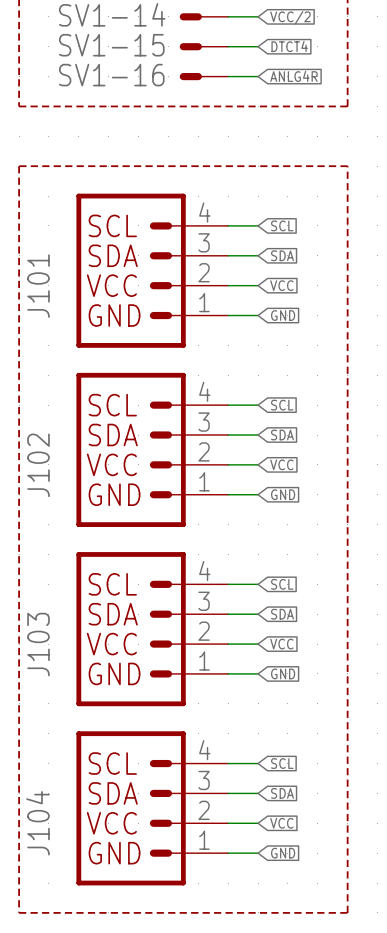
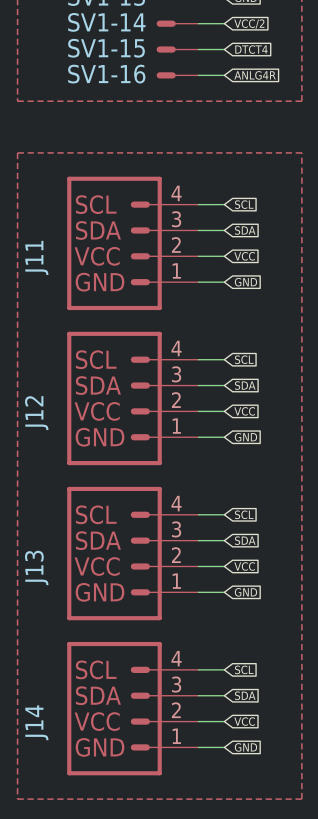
J101 name: J101 (38, 286) -> J11 (36, 257)
J102 name: J102 (38, 465) -> J12 (36, 413)
J103 name: J103 (38, 644) -> J13 (36, 567)
J104 name: J104 (38, 823) -> J14 (36, 722)

